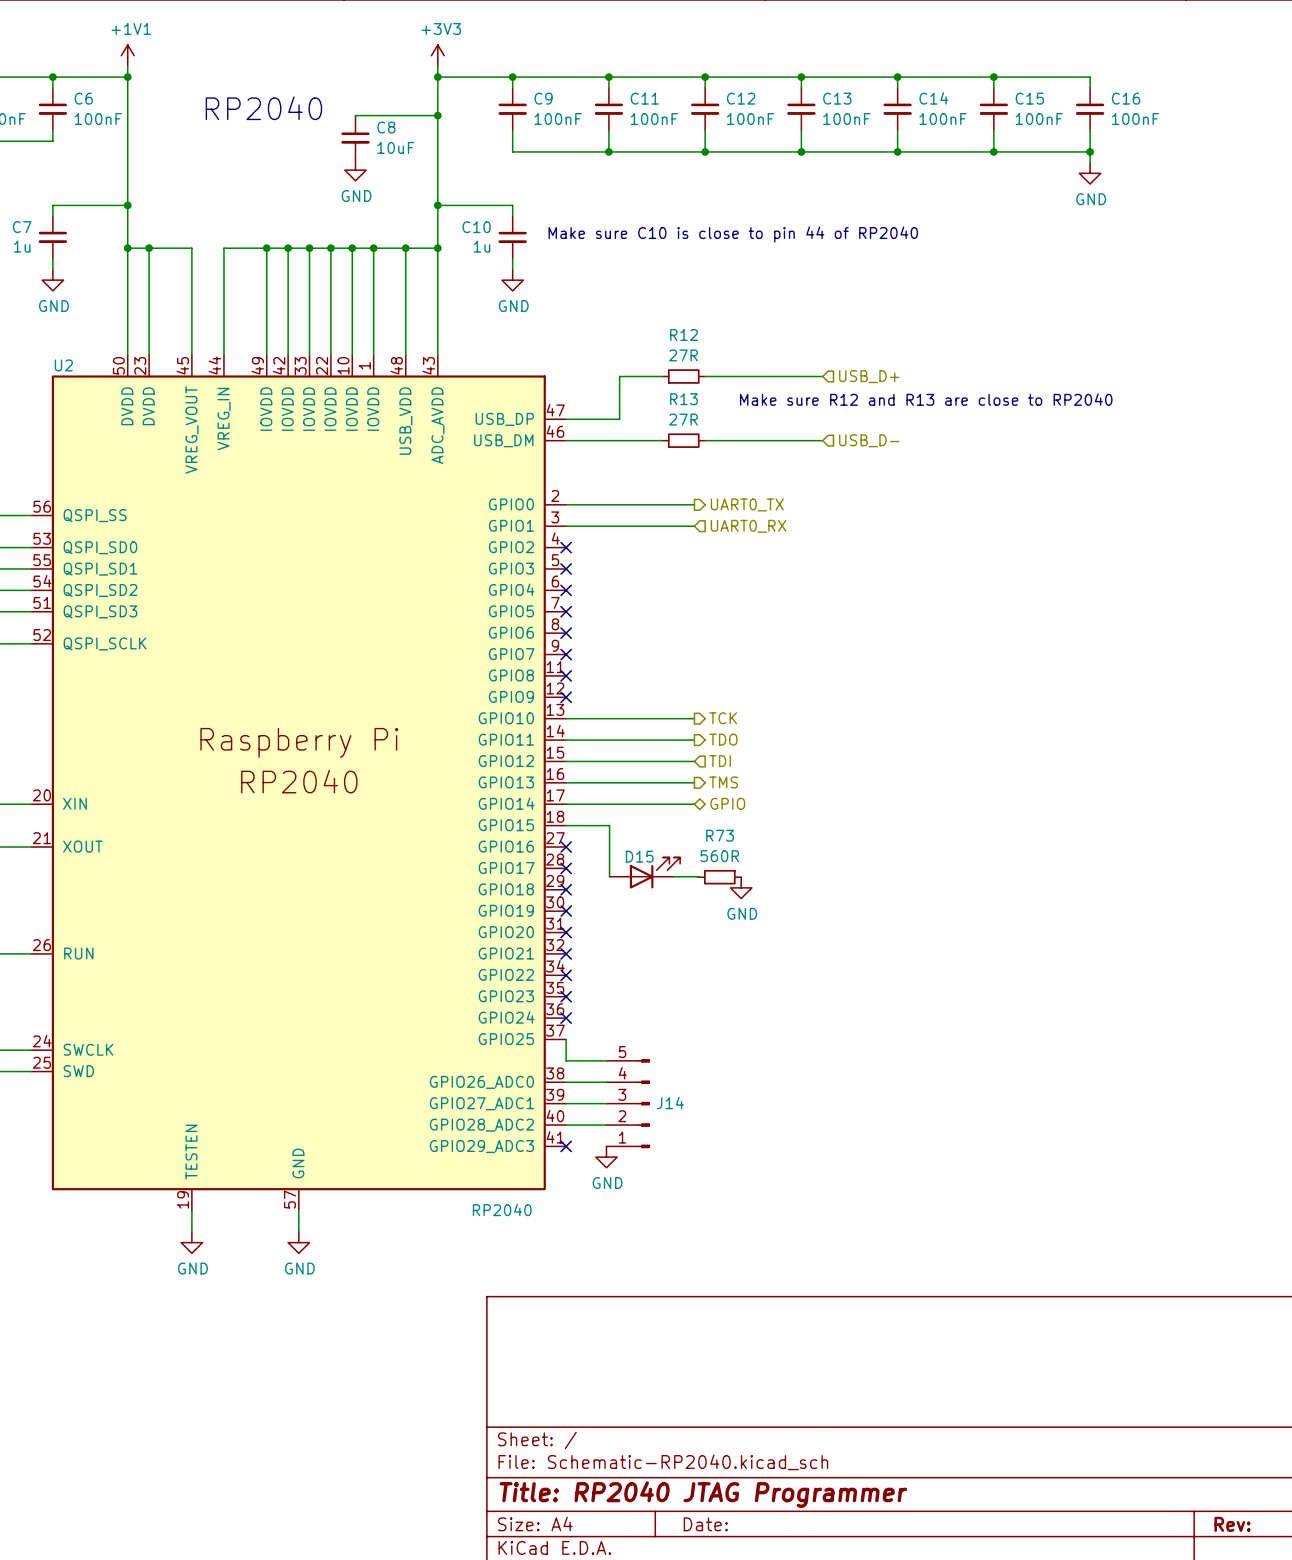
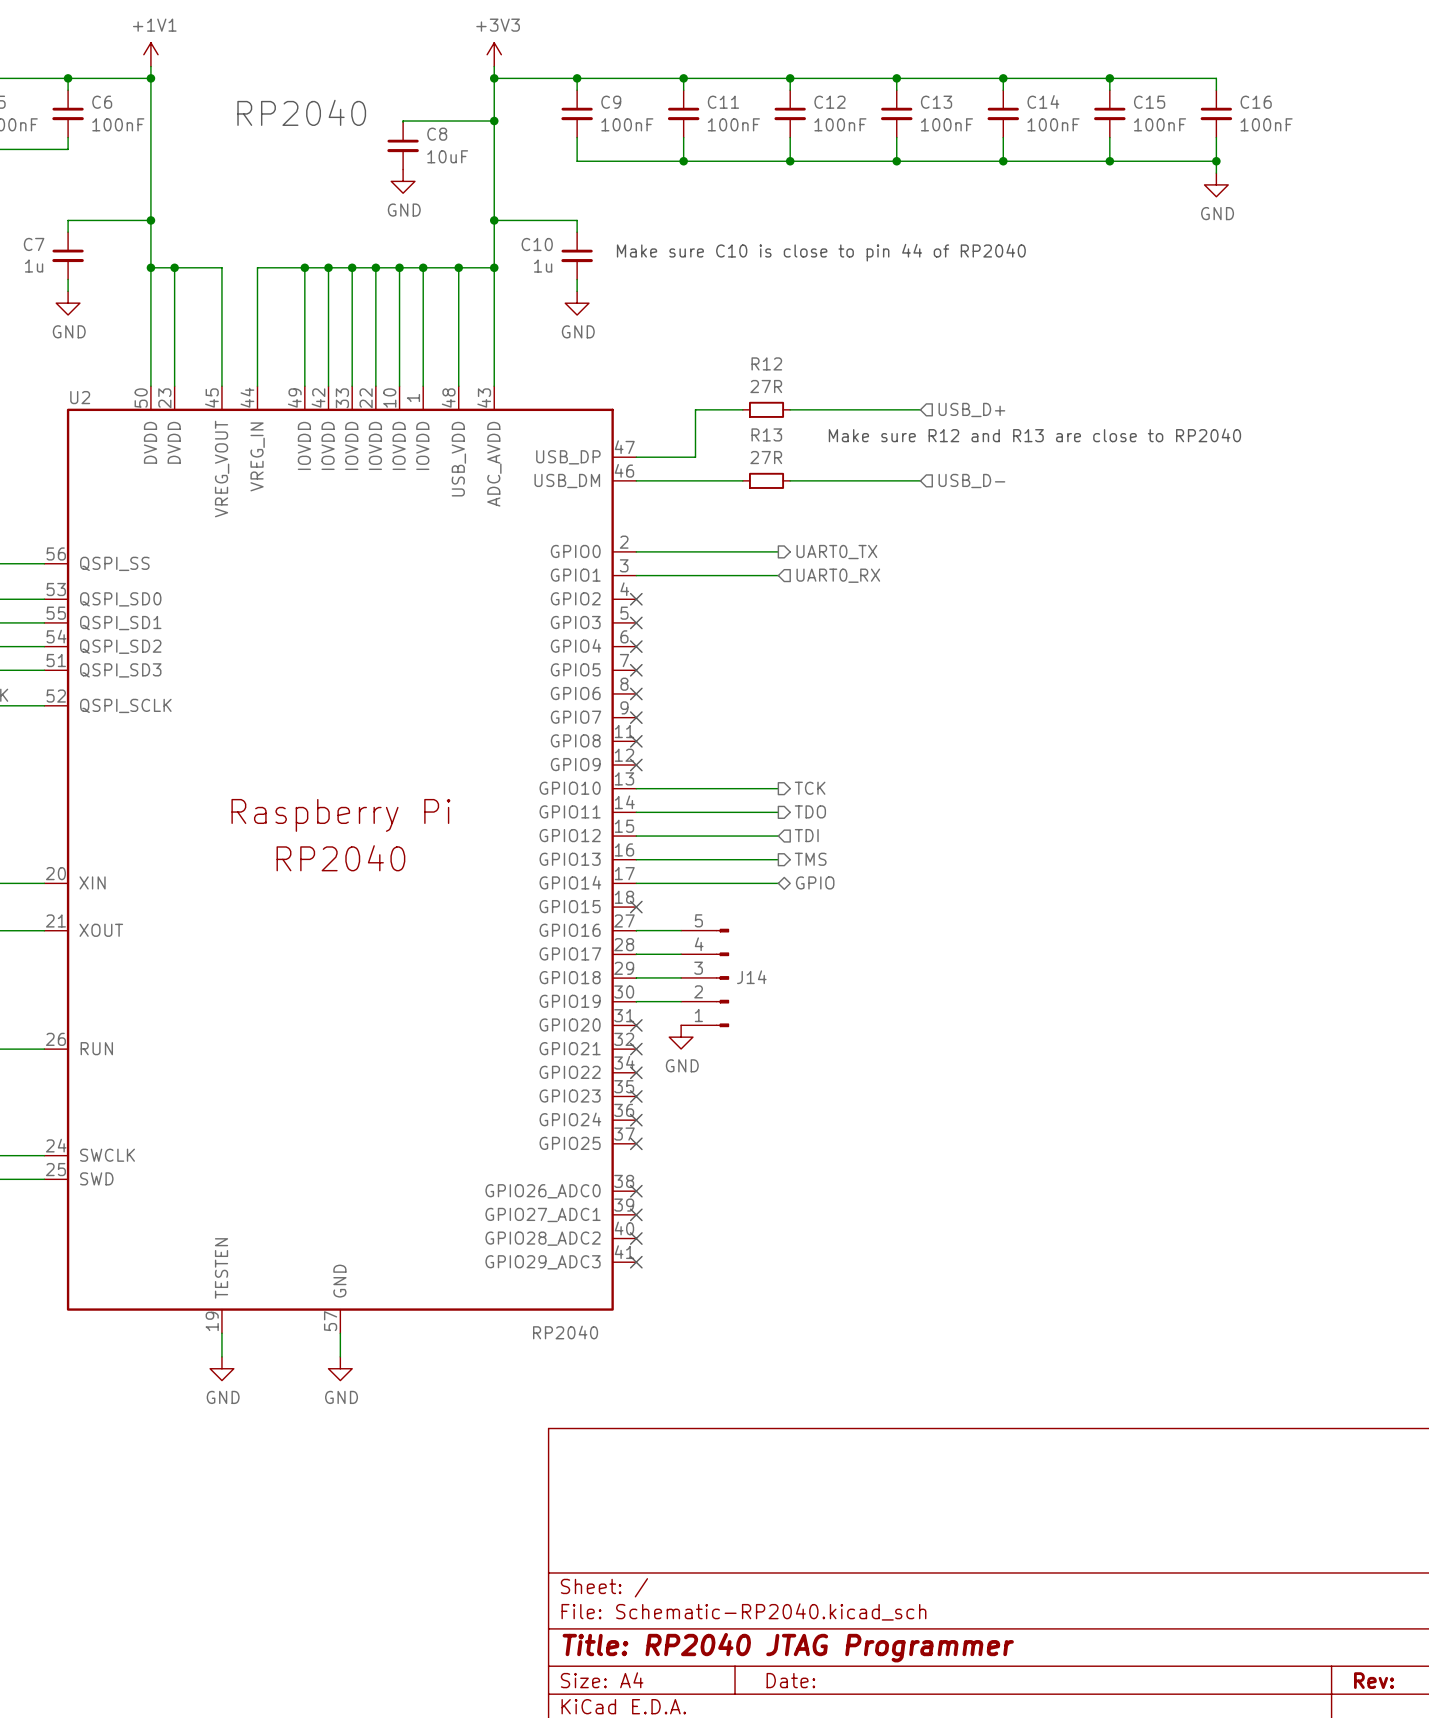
wire: (566, 825) (609, 825) (609, 876) -> none
no-connect mark: none -> (636, 907)
wire: none -> (636, 930) (681, 930)
no-connect mark: (566, 847) -> none
wire: none -> (636, 954) (681, 954)
no-connect mark: (566, 868) -> none
D15: (644, 872) -> none
wire: (673, 876) (698, 877) -> none
R73: 560R (719, 877) -> none
power symbol: GND (741, 887) -> none
no-connect mark: (566, 889) -> none
no-connect mark: (566, 911) -> none
power symbol: none -> GND (681, 1037)
wire: (566, 1039) (566, 1060) (606, 1060) -> none
no-connect mark: none -> (636, 1143)
wire: (566, 1082) (606, 1082) -> (636, 977) (681, 977)
no-connect mark: none -> (636, 1191)
wire: (566, 1103) (606, 1103) -> (636, 1001) (681, 1001)
no-connect mark: none -> (636, 1214)
J14 position: (628, 1103) -> (705, 977)
wire: (566, 1125) (606, 1125) -> none
no-connect mark: none -> (636, 1238)
power symbol: GND (606, 1157) -> none

